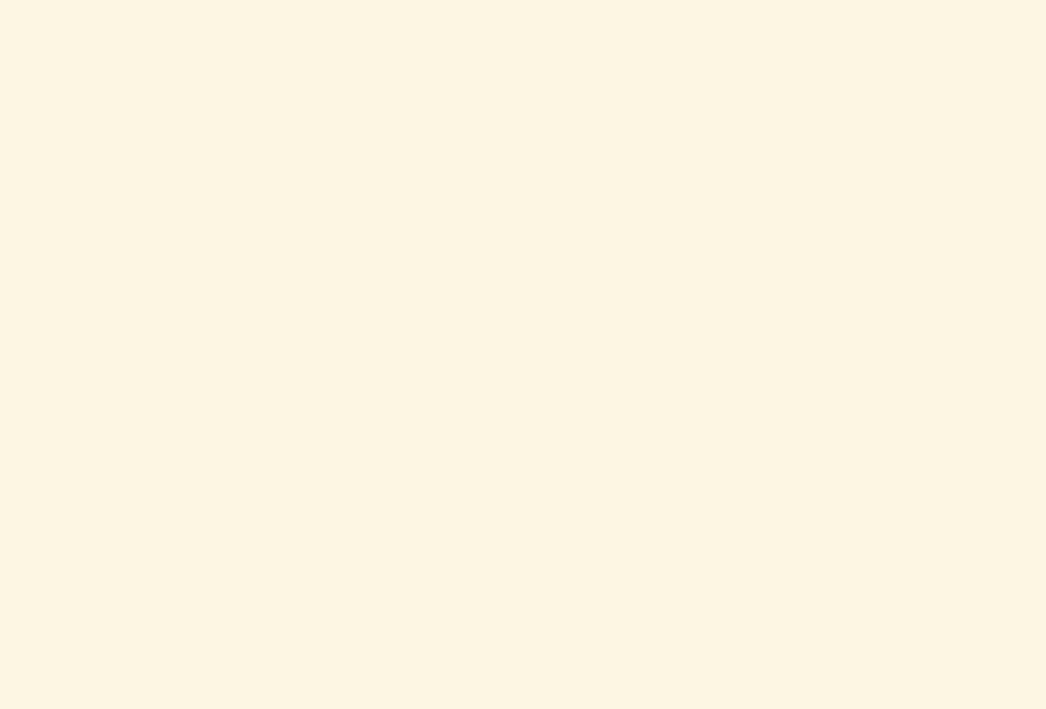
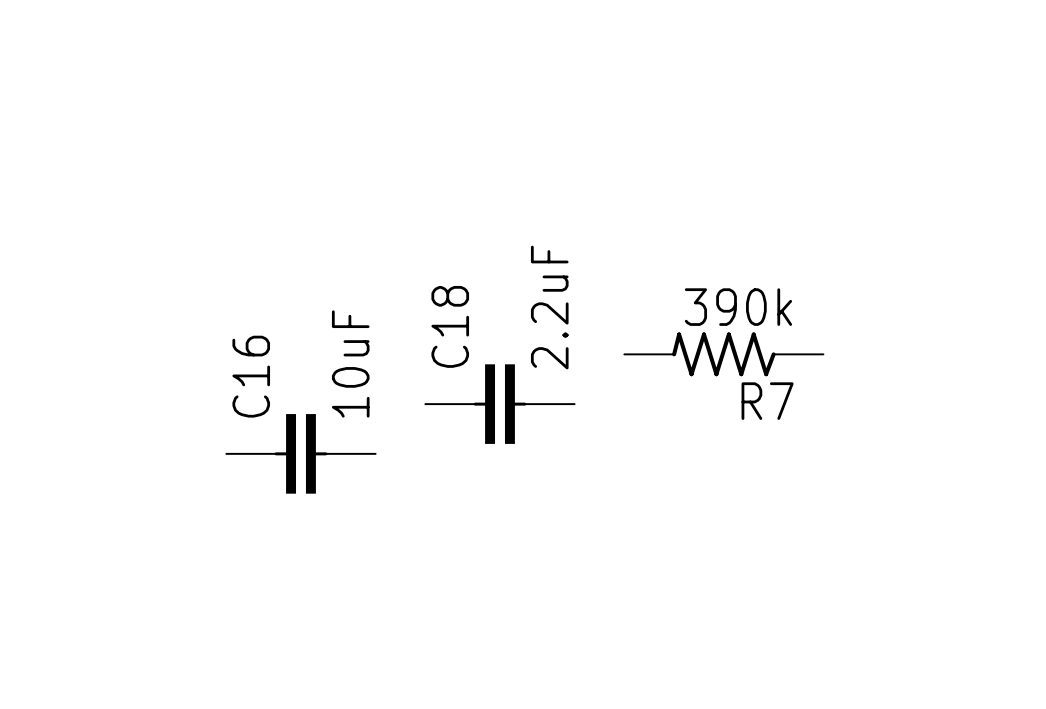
R7: none -> 390k (723, 354)
C18: none -> 2.2uF (499, 404)
C16: none -> 10uF (300, 453)

